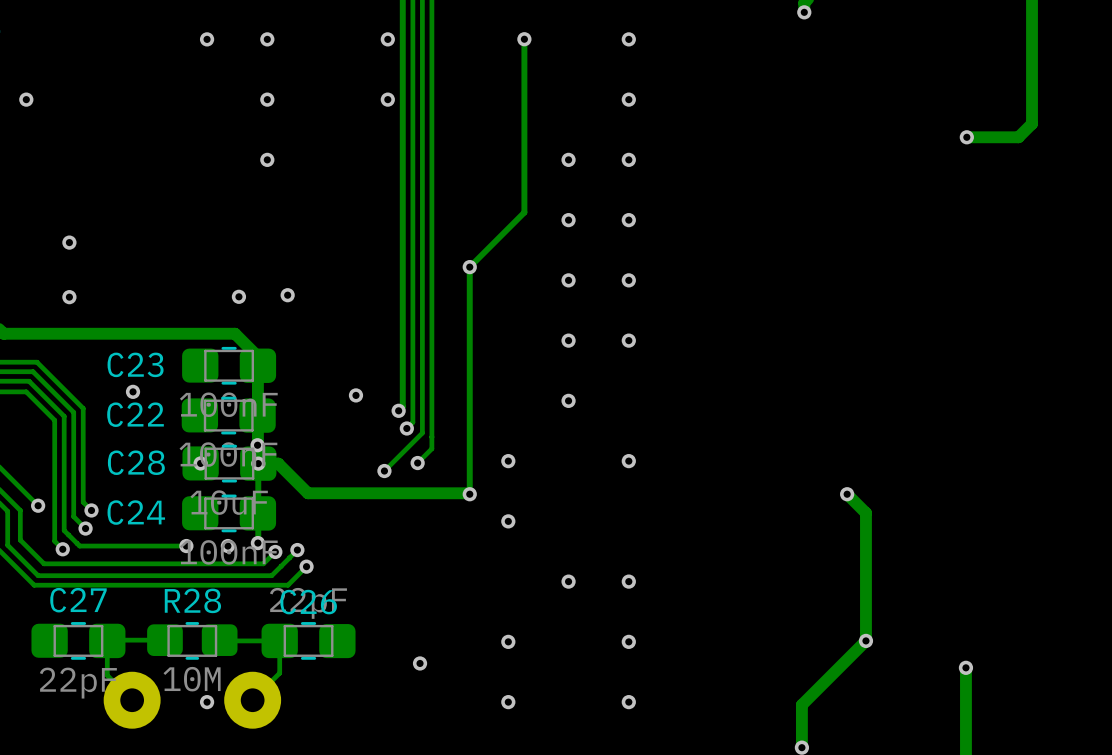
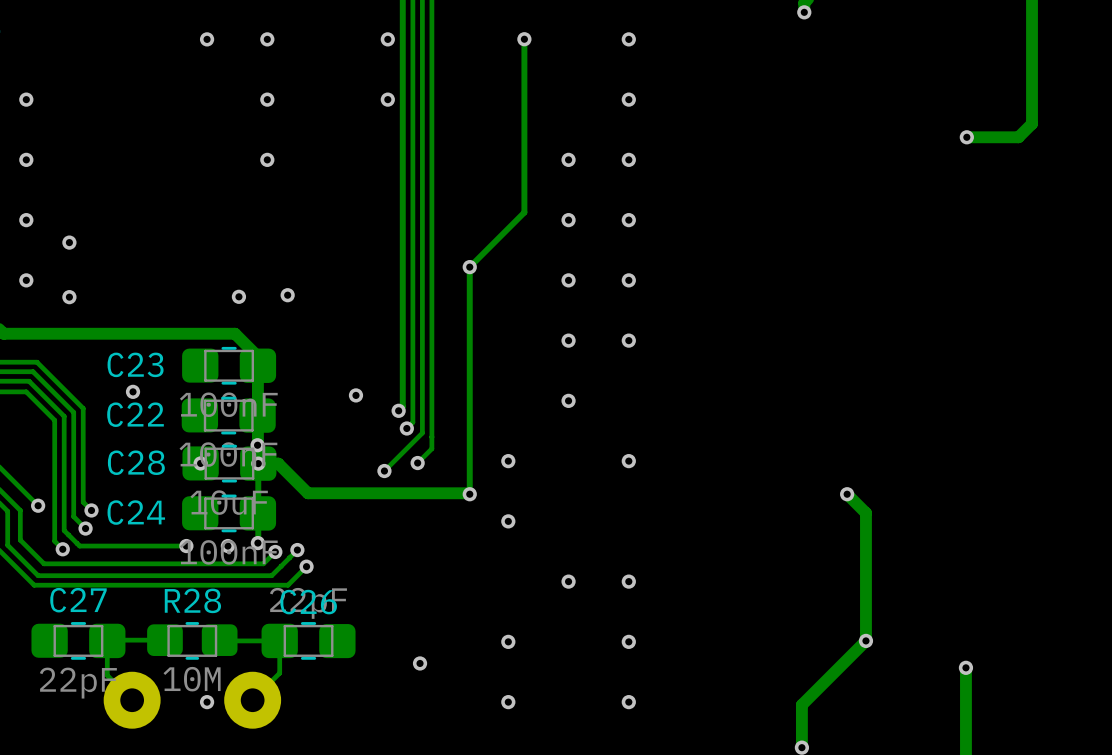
via: none -> (26, 159)
via: none -> (26, 220)
via: none -> (26, 280)

